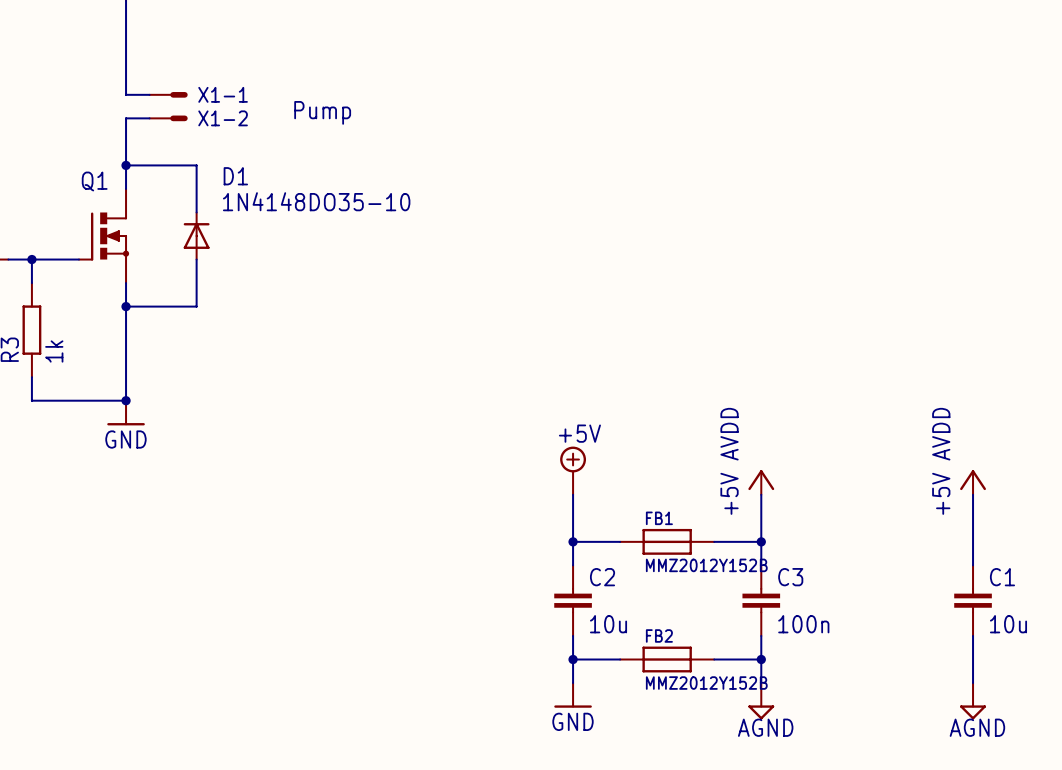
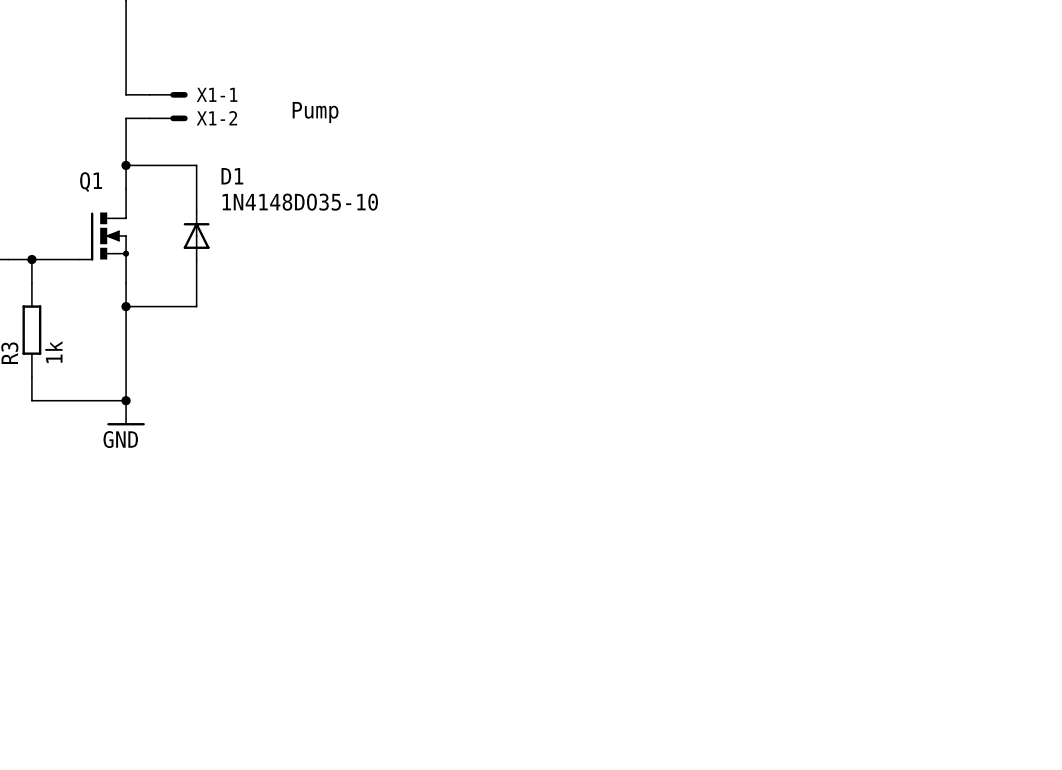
power symbol: +5V (573, 470) -> none
power symbol: +5V AVDD (761, 482) -> none
power symbol: +5V AVDD (973, 482) -> none
wire: (573, 494) (573, 565) -> none
wire: (761, 494) (761, 565) -> none
wire: (973, 494) (973, 565) -> none
wire: (573, 541) (620, 541) -> none
junction: (573, 541) -> none
FB1: MMZ2012Y152B (667, 541) -> none
wire: (714, 541) (761, 541) -> none
junction: (761, 541) -> none
C2: 10u (573, 600) -> none
C3: 100n (761, 600) -> none
C1: 10u (973, 600) -> none
wire: (573, 635) (573, 683) -> none
wire: (761, 635) (761, 683) -> none
wire: (973, 635) (973, 683) -> none
wire: (573, 659) (620, 659) -> none
junction: (573, 659) -> none
FB2: MMZ2012Y152B (667, 659) -> none
wire: (714, 659) (761, 659) -> none
junction: (761, 659) -> none
power symbol: GND (573, 695) -> none
power symbol: AGND (761, 701) -> none
power symbol: AGND (973, 701) -> none

